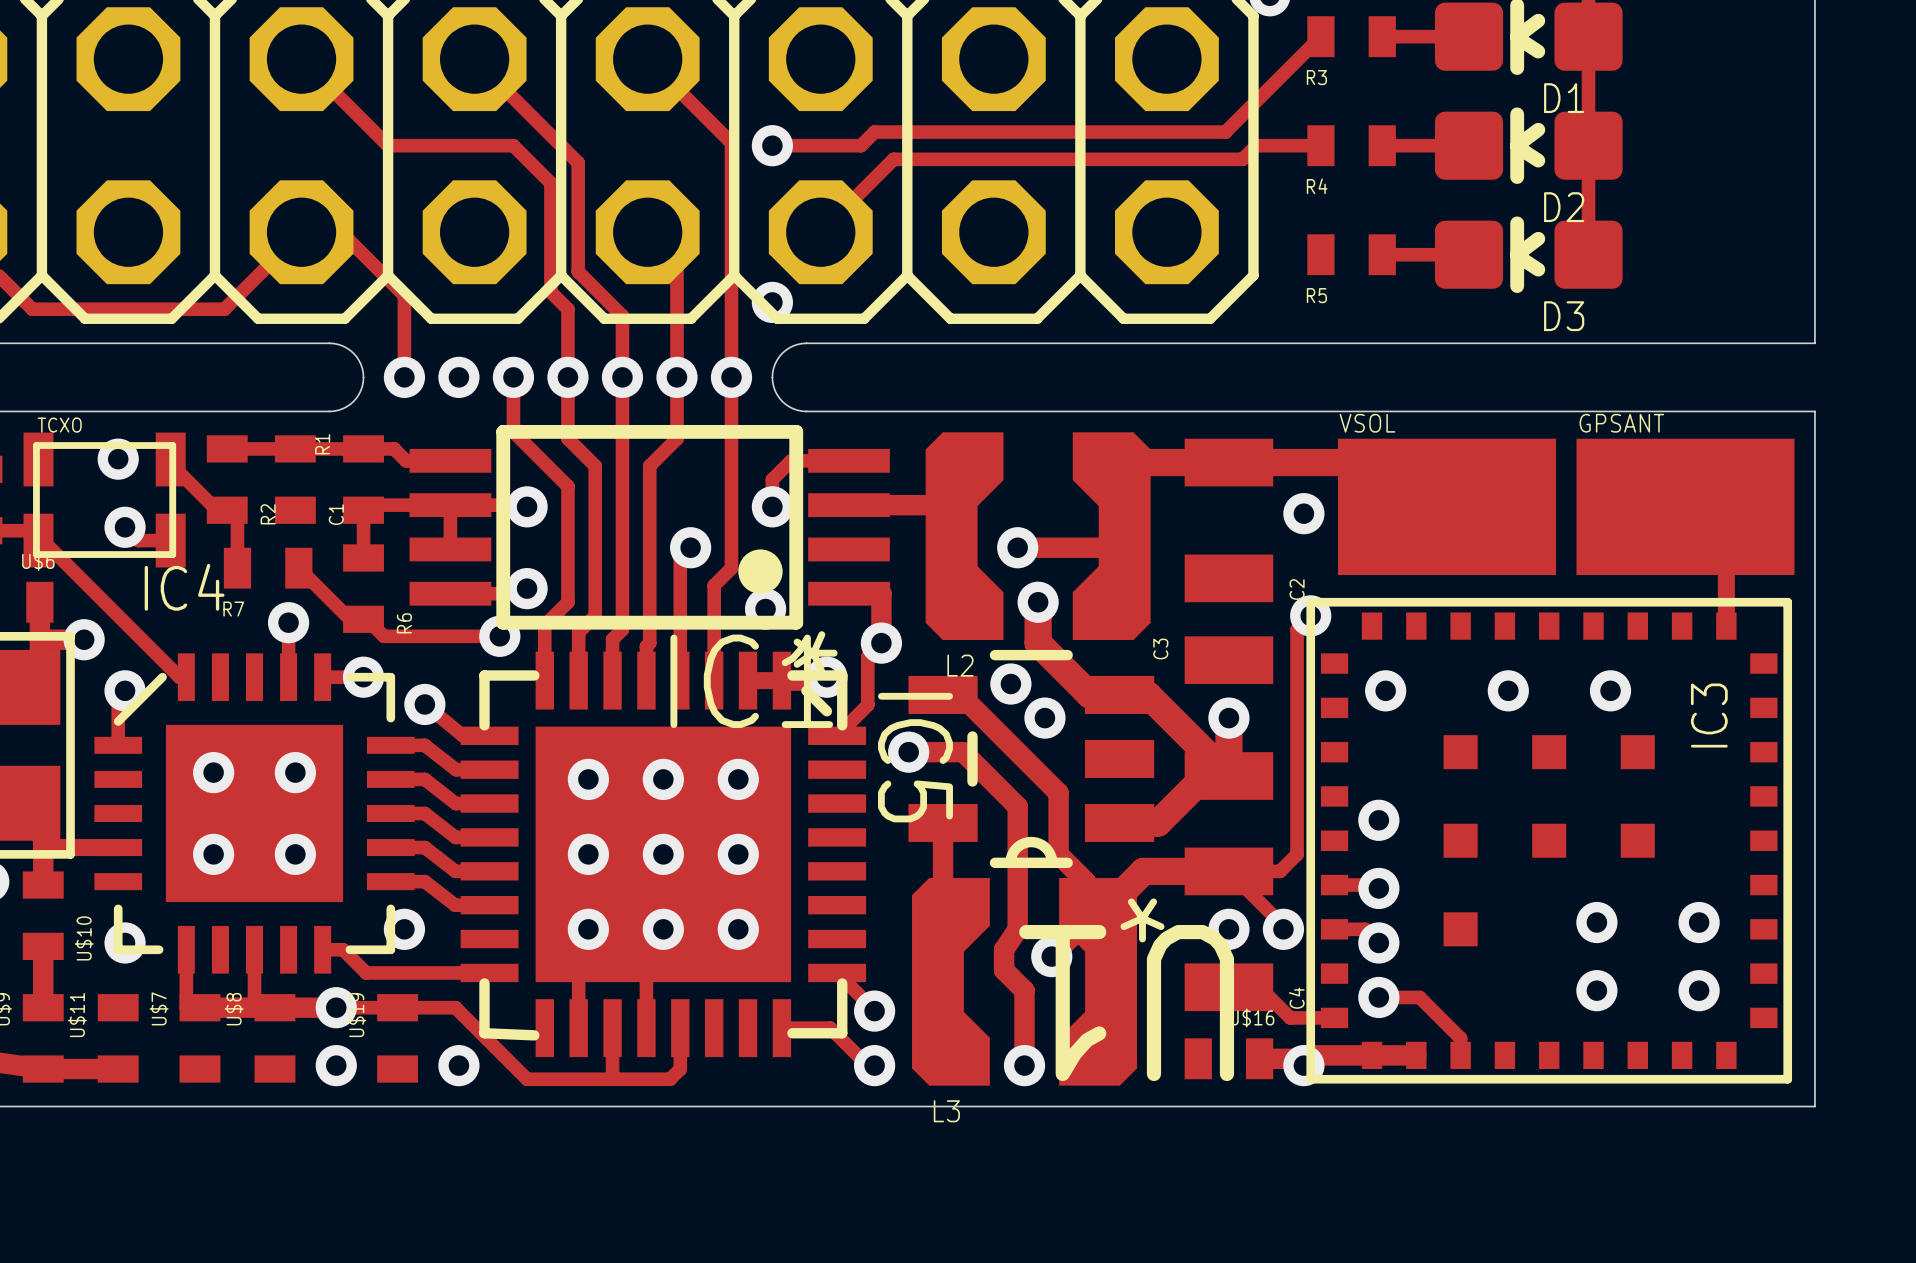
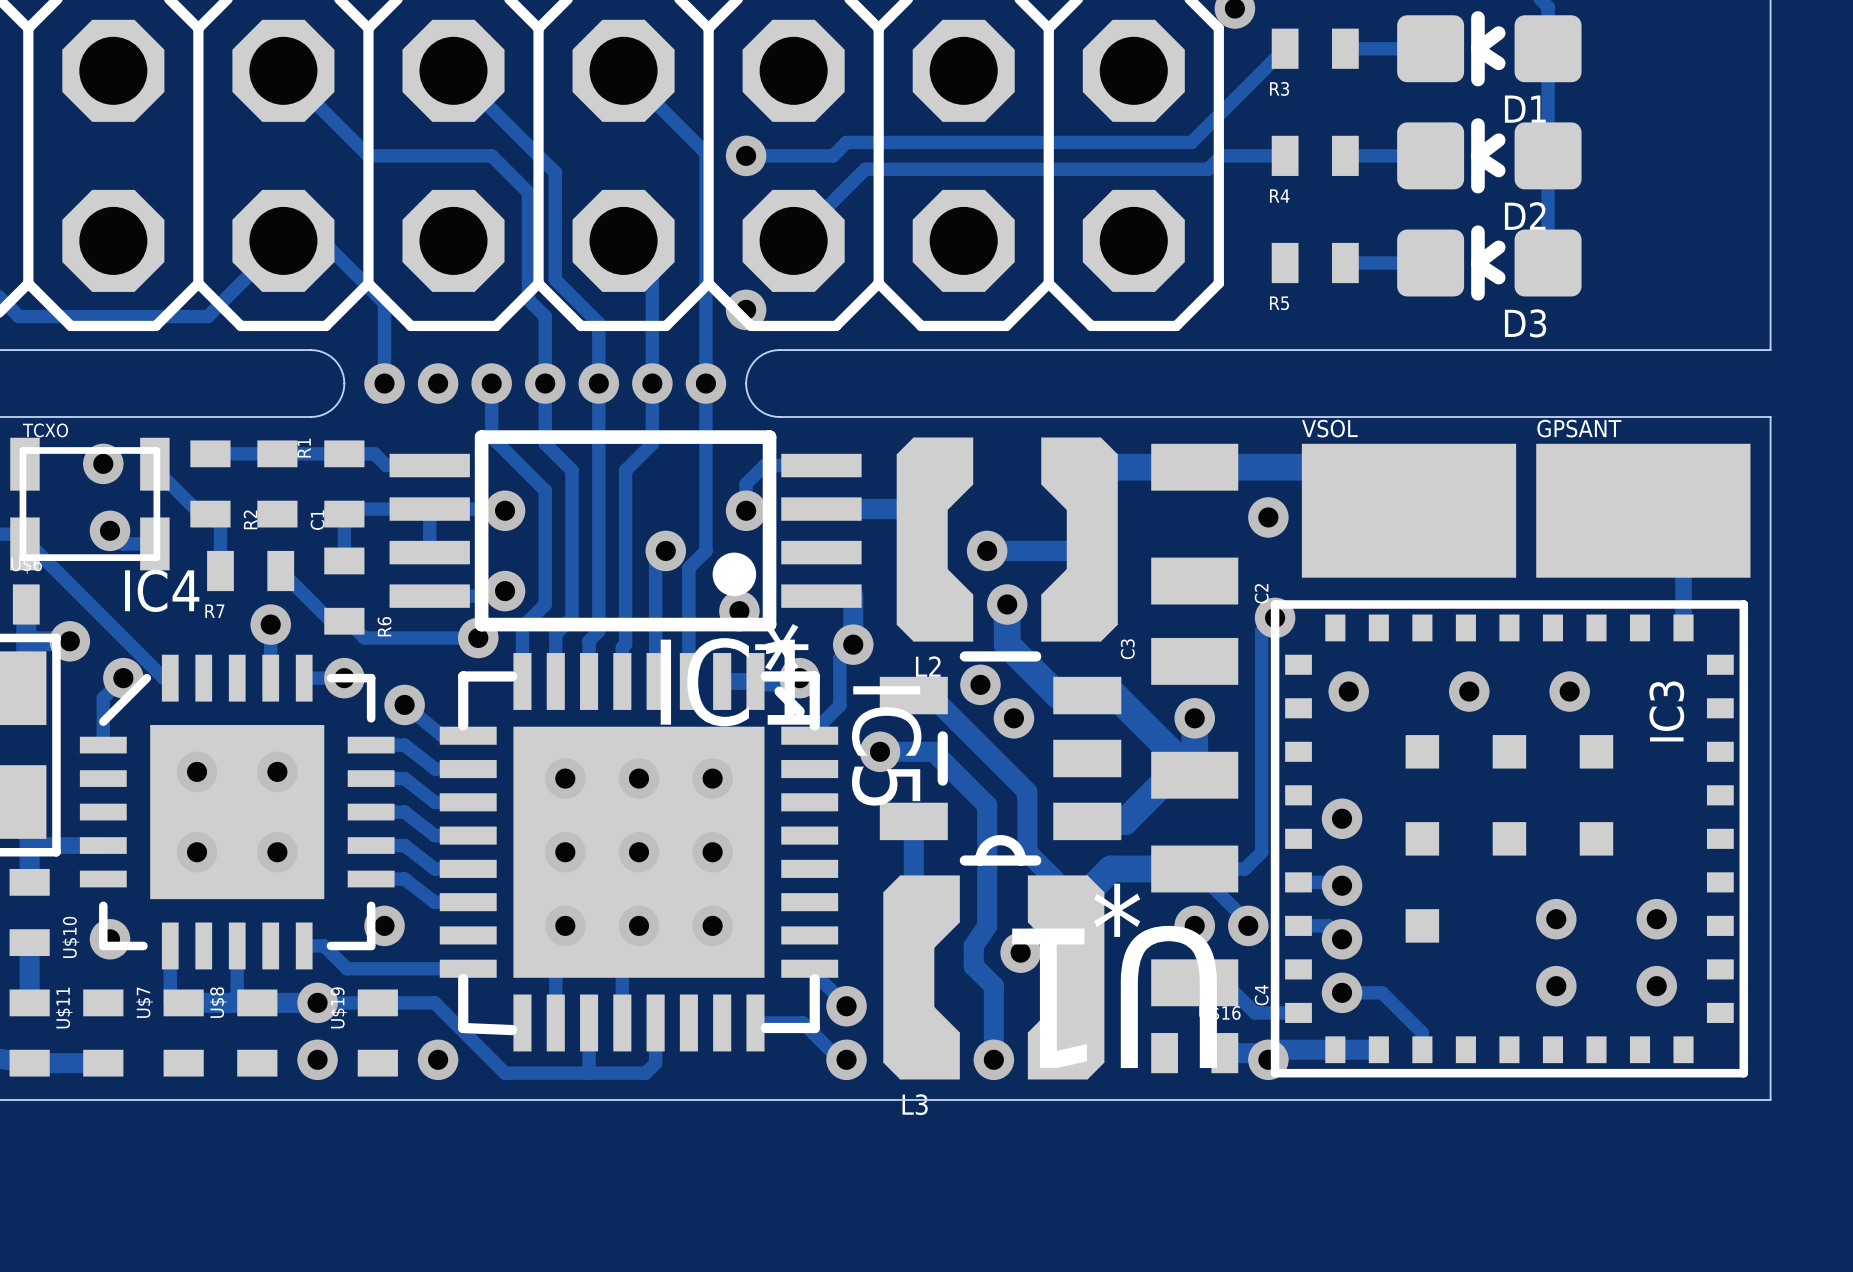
track: (731, 547) (731, 568) (714, 585) -> (705, 550) (688, 567) (688, 588)
via position: (125, 690) -> (123, 678)

